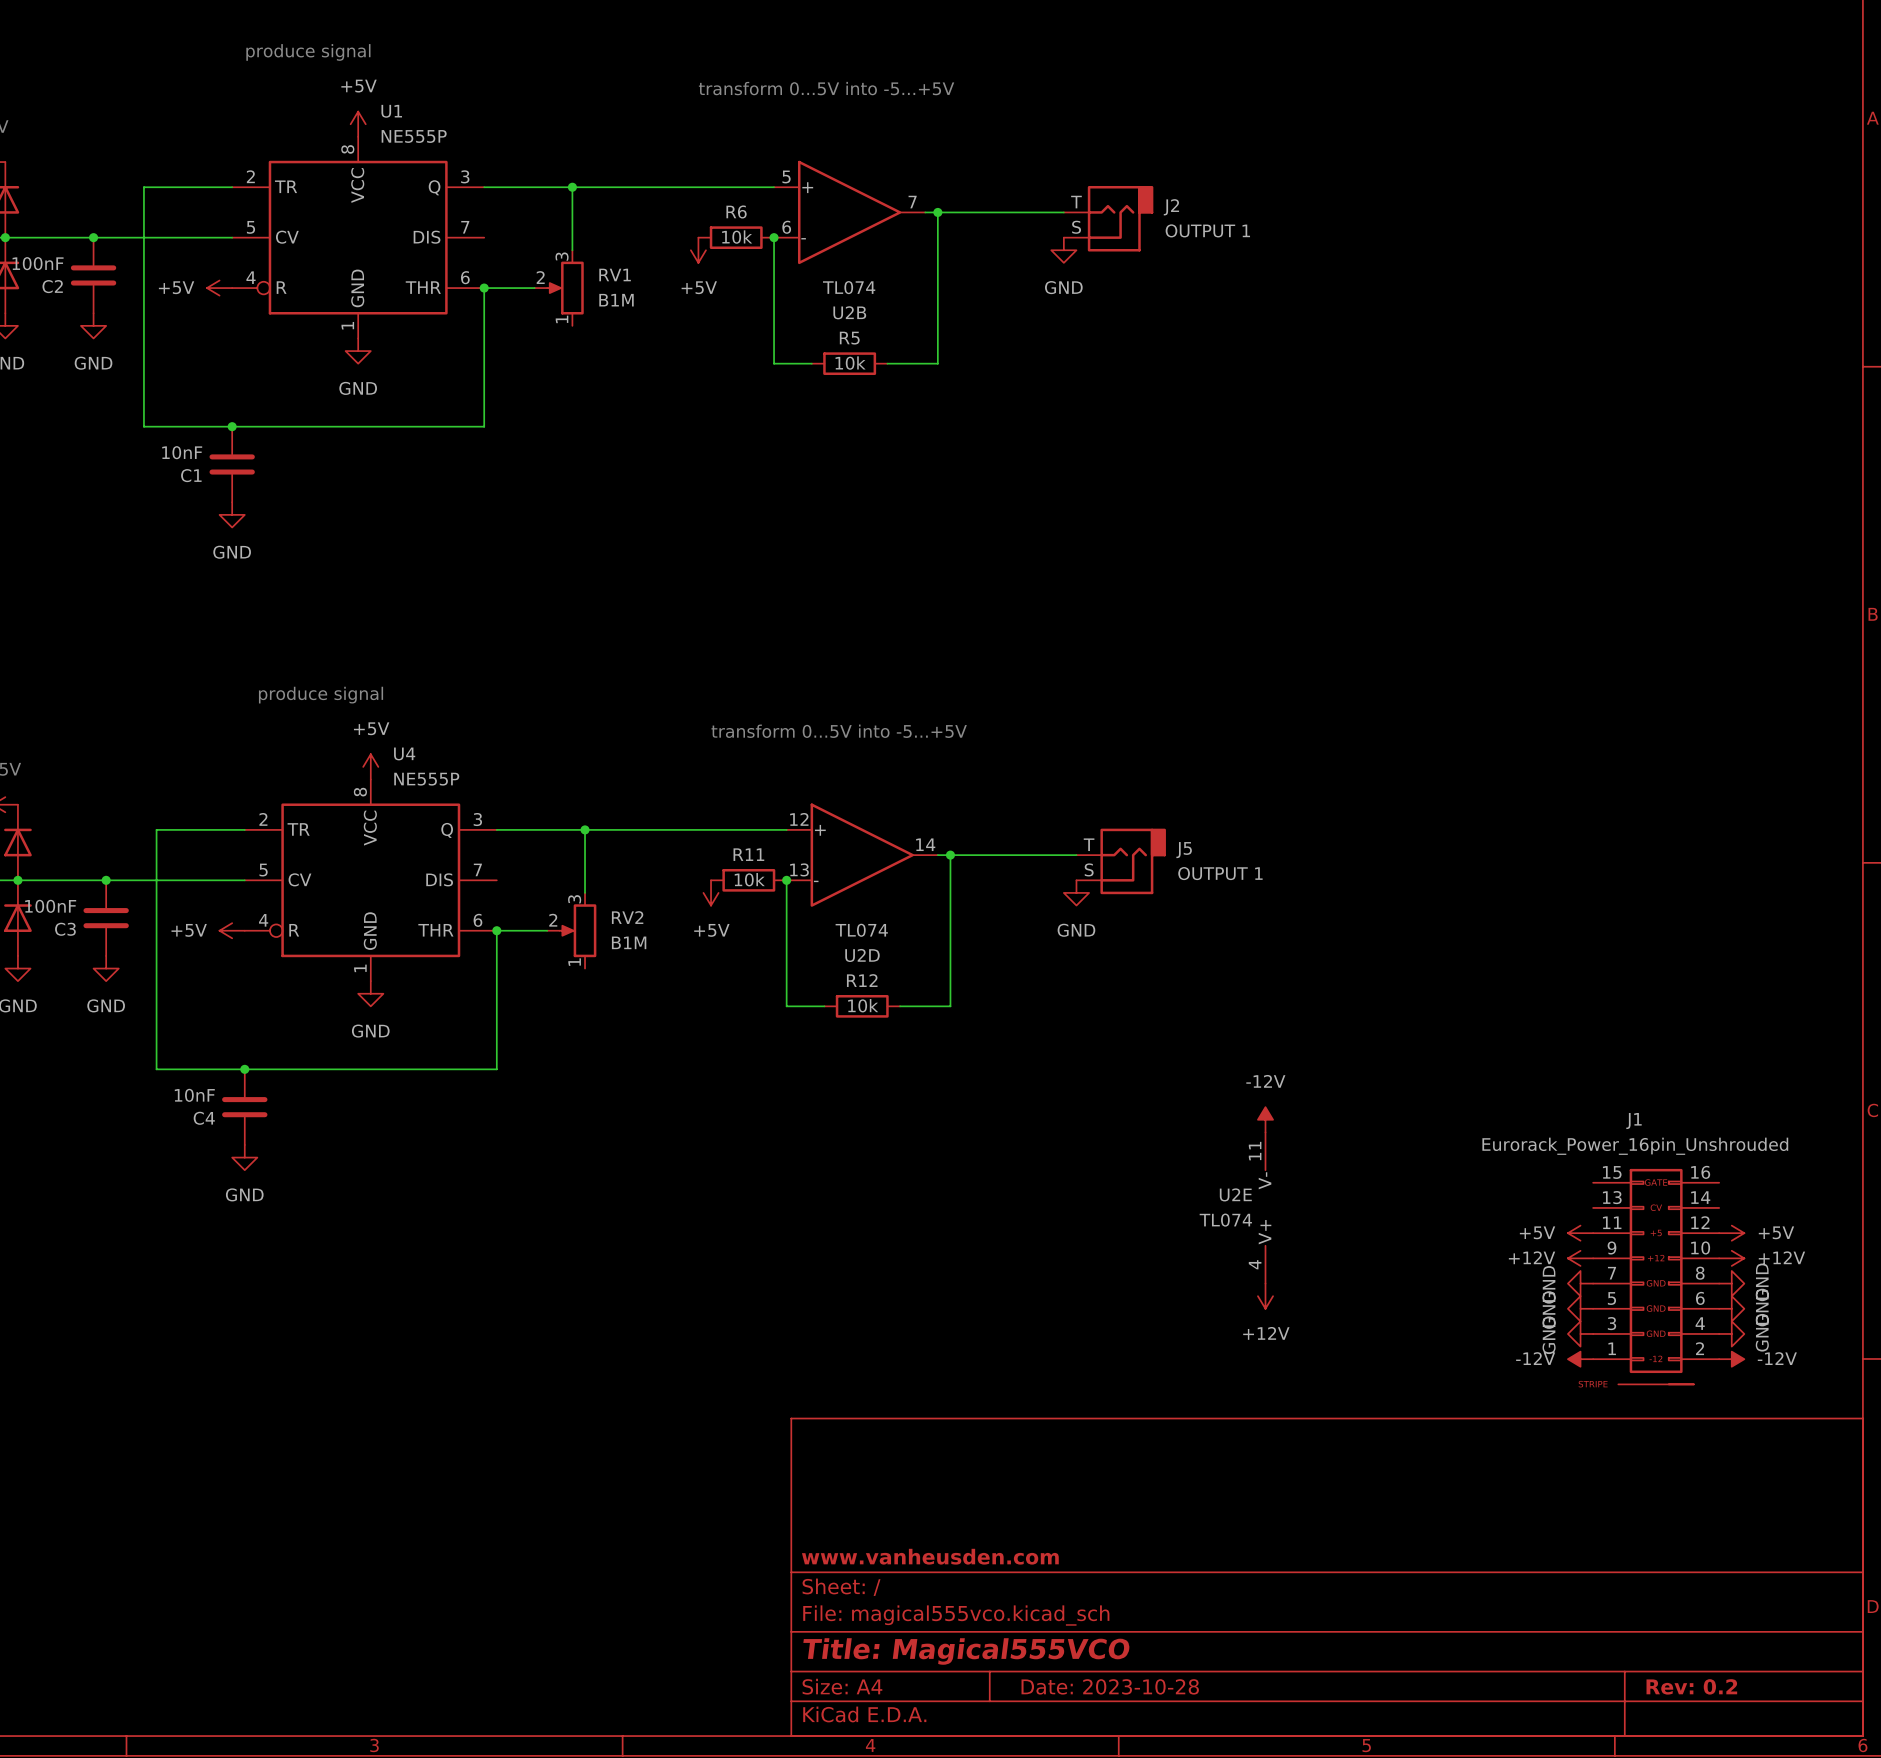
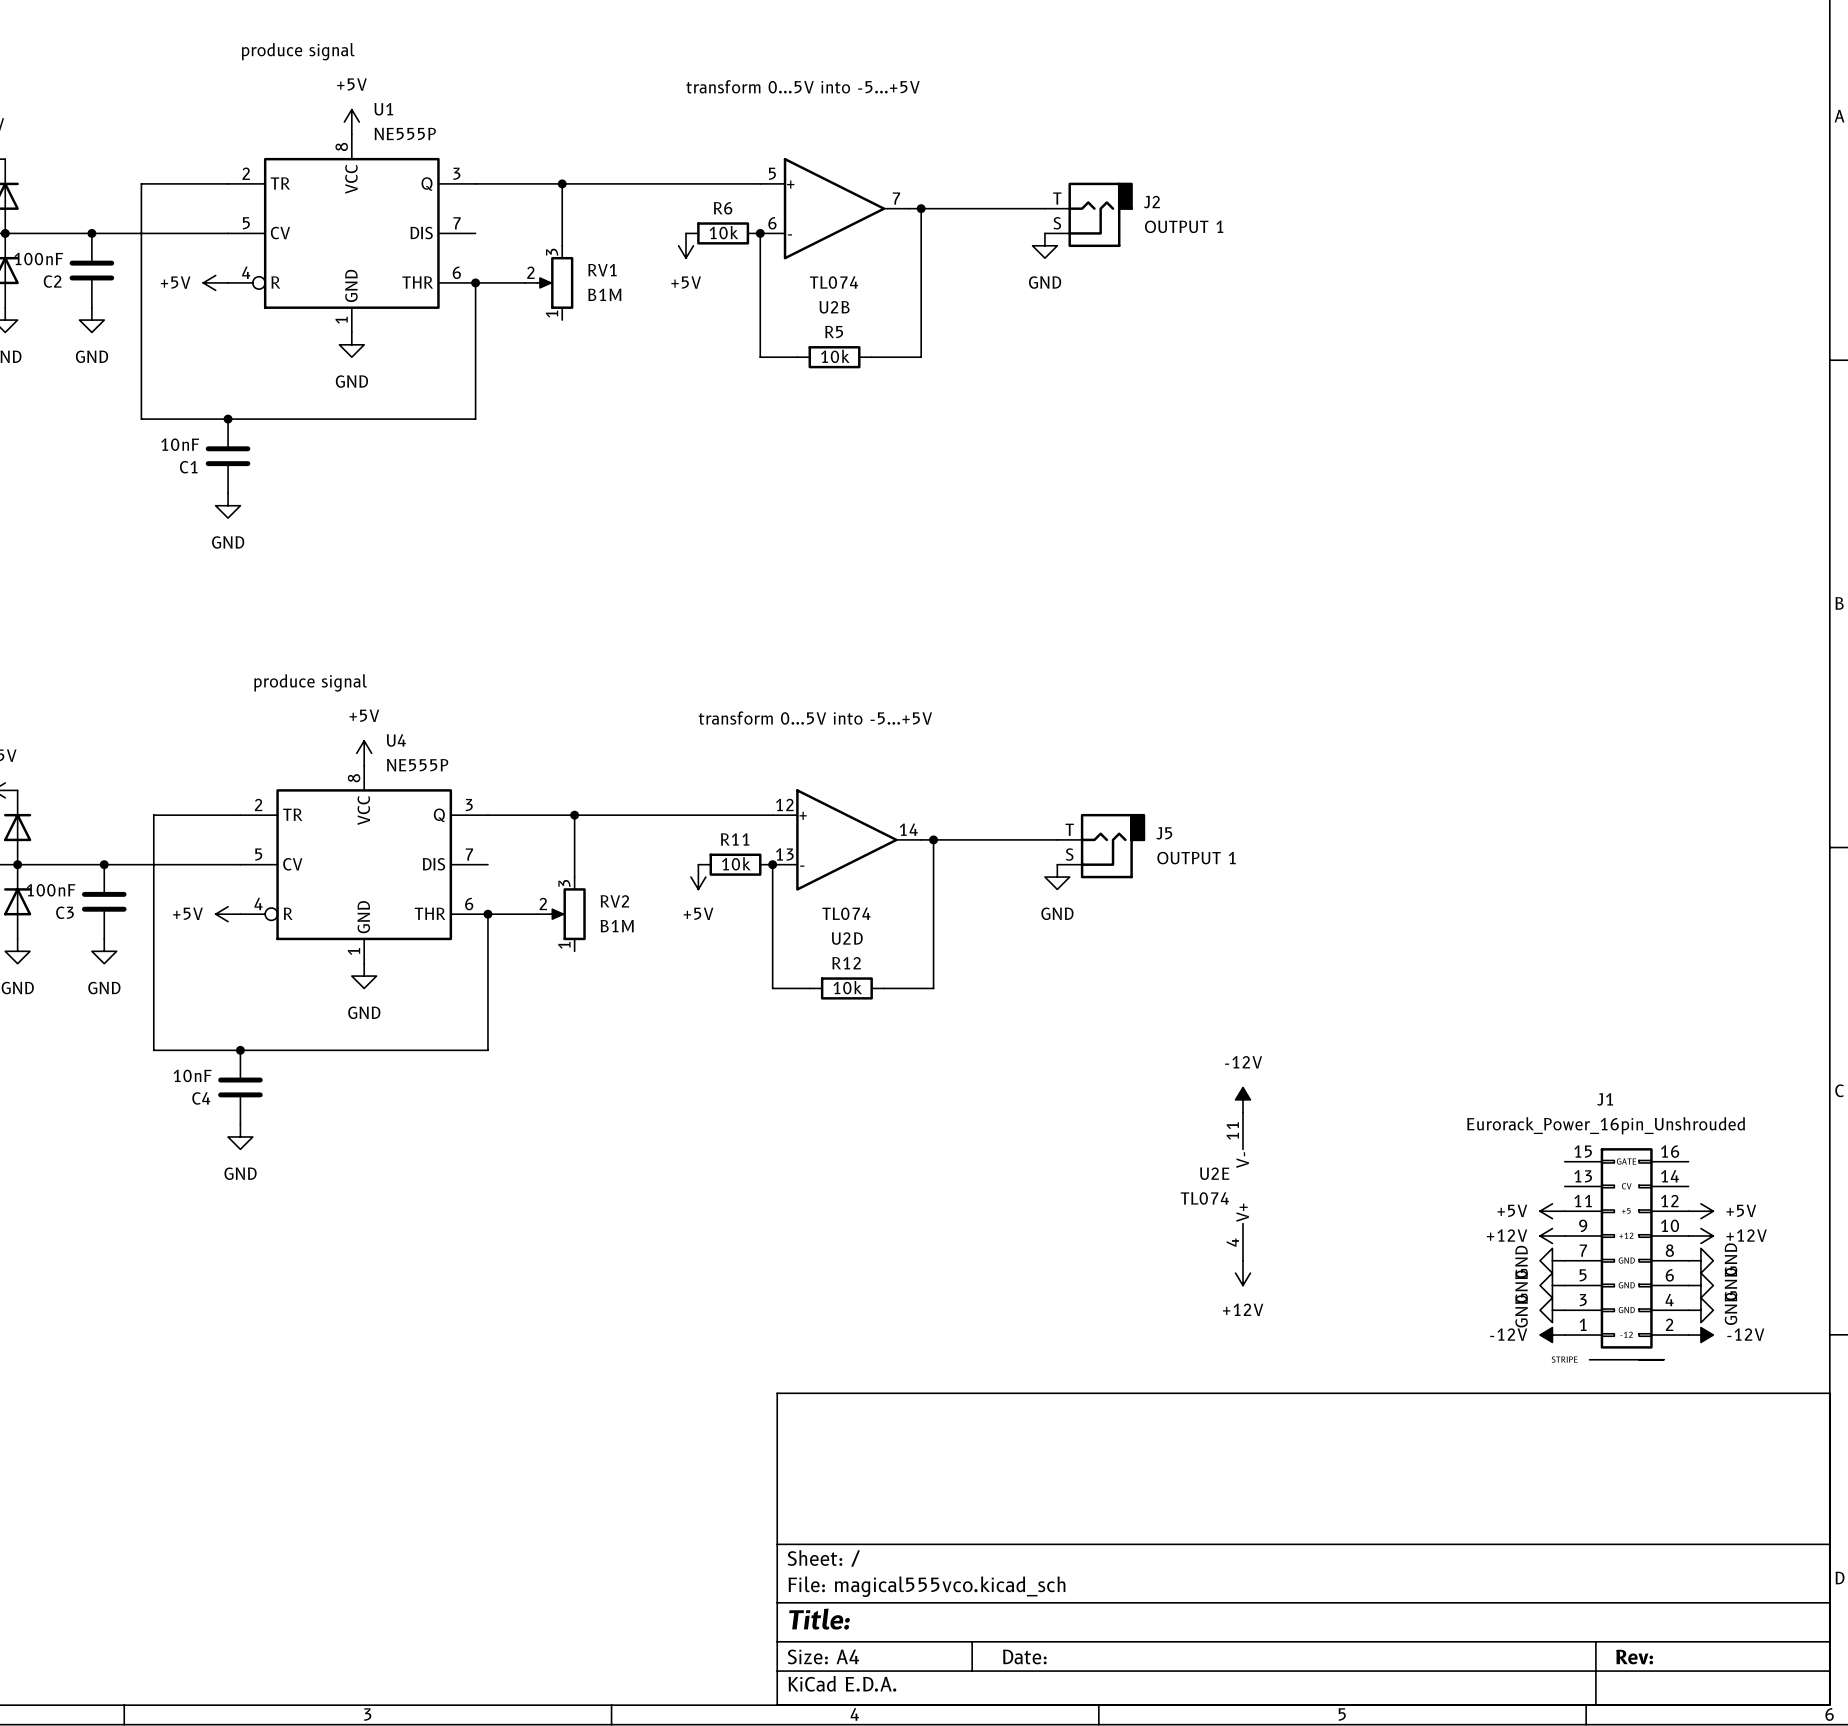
title block: www.vanheusden.com (930, 1556) -> none
title block: Title: Magical555VCO (966, 1651) -> Title: (819, 1619)
title block: Date: 2023-10-28 (1110, 1686) -> Date: (1024, 1656)
title block: Rev: 0.2 (1691, 1686) -> Rev: (1634, 1657)

